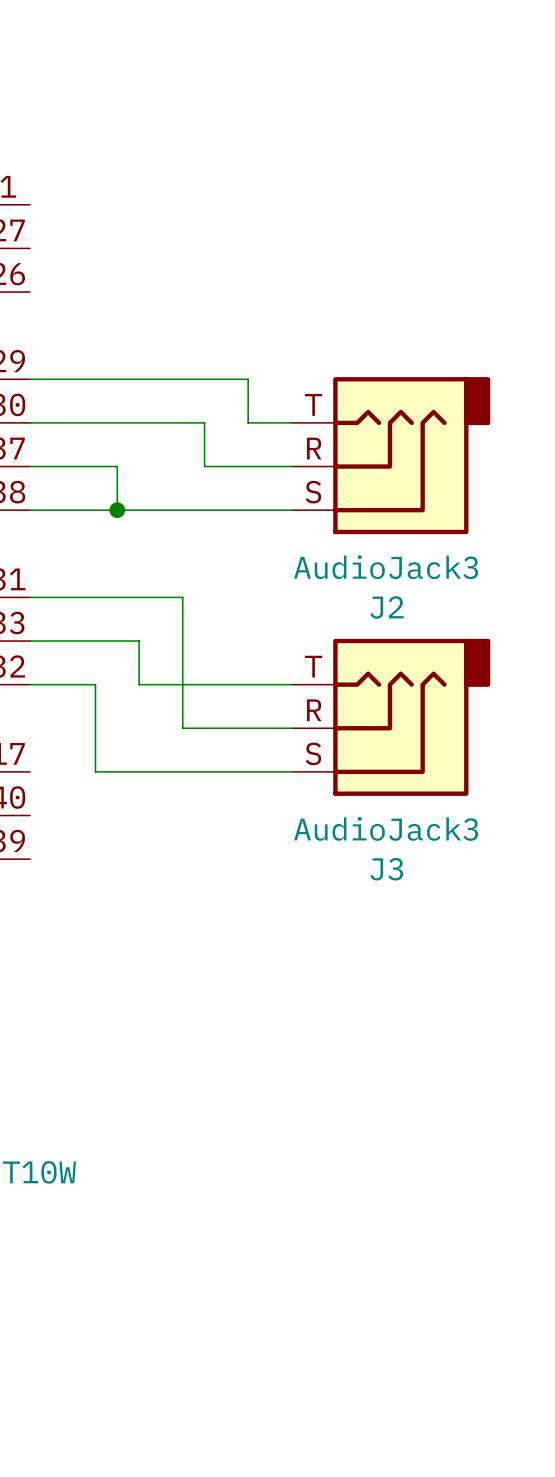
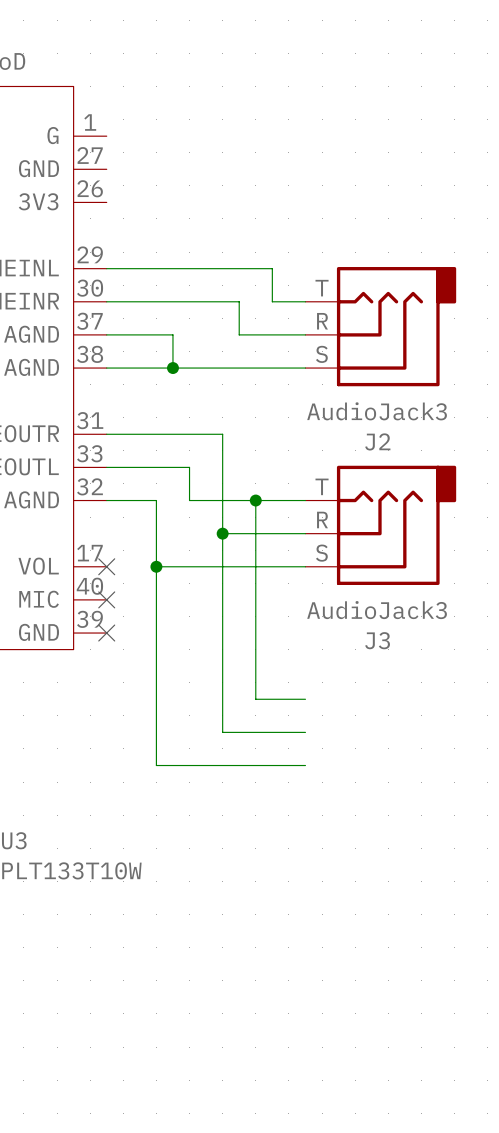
wire: none -> (255, 500) (255, 699) (305, 699)
junction: none -> (255, 500)
wire: none -> (222, 533) (222, 732) (305, 732)
junction: none -> (222, 533)
no-connect mark: none -> (106, 566)
wire: none -> (156, 566) (156, 765) (305, 765)
junction: none -> (156, 566)
no-connect mark: none -> (106, 599)
no-connect mark: none -> (106, 633)

